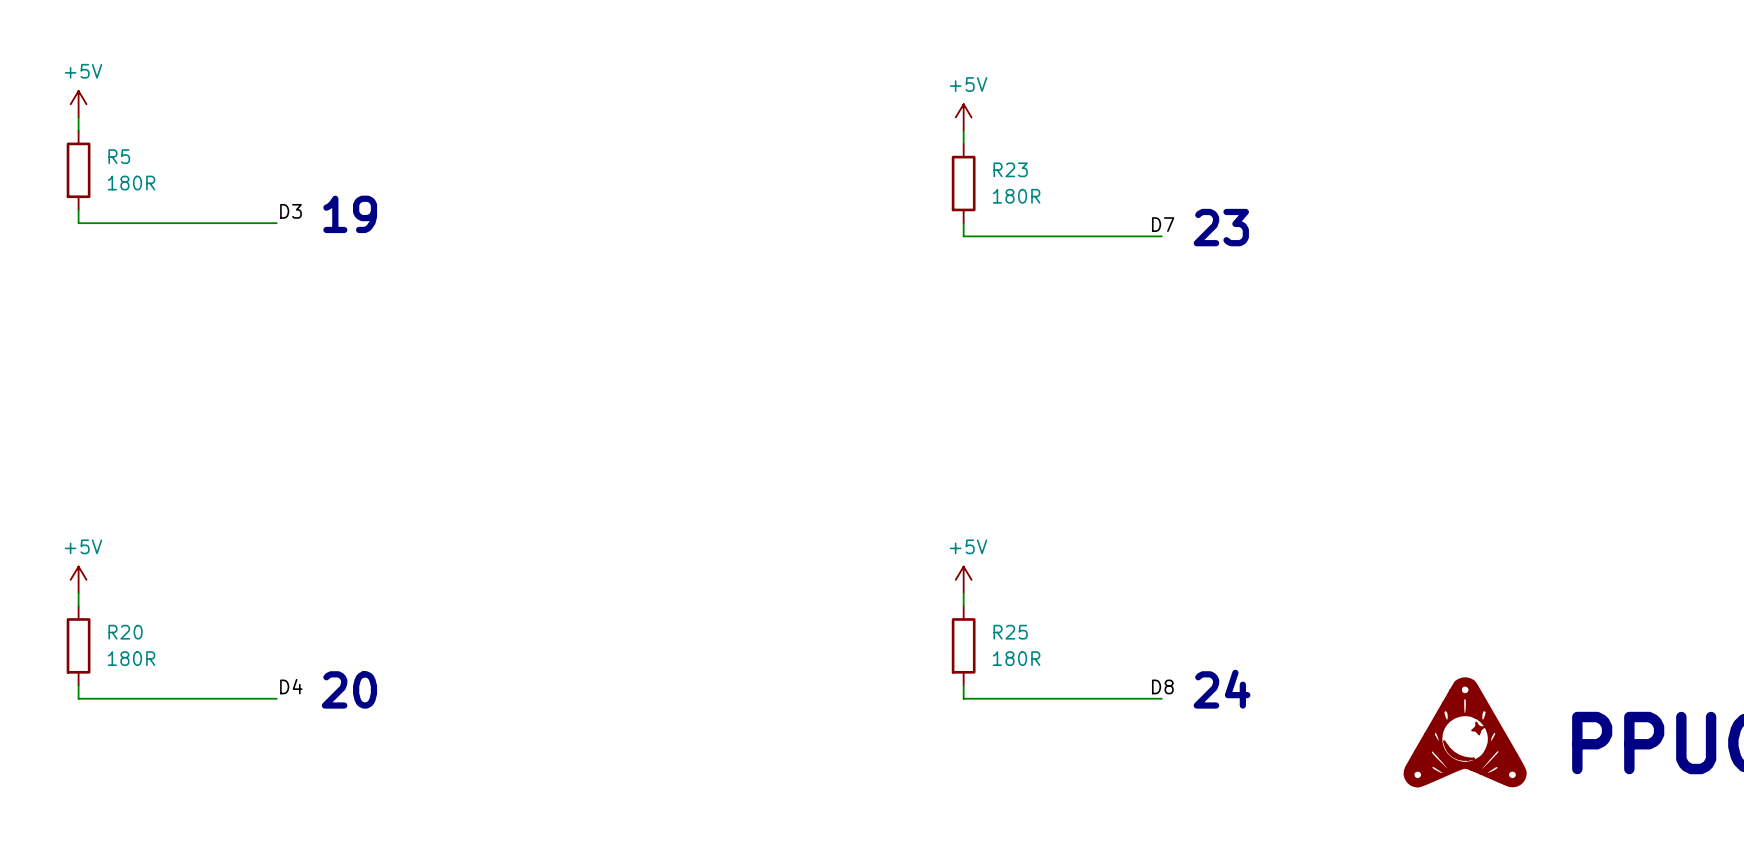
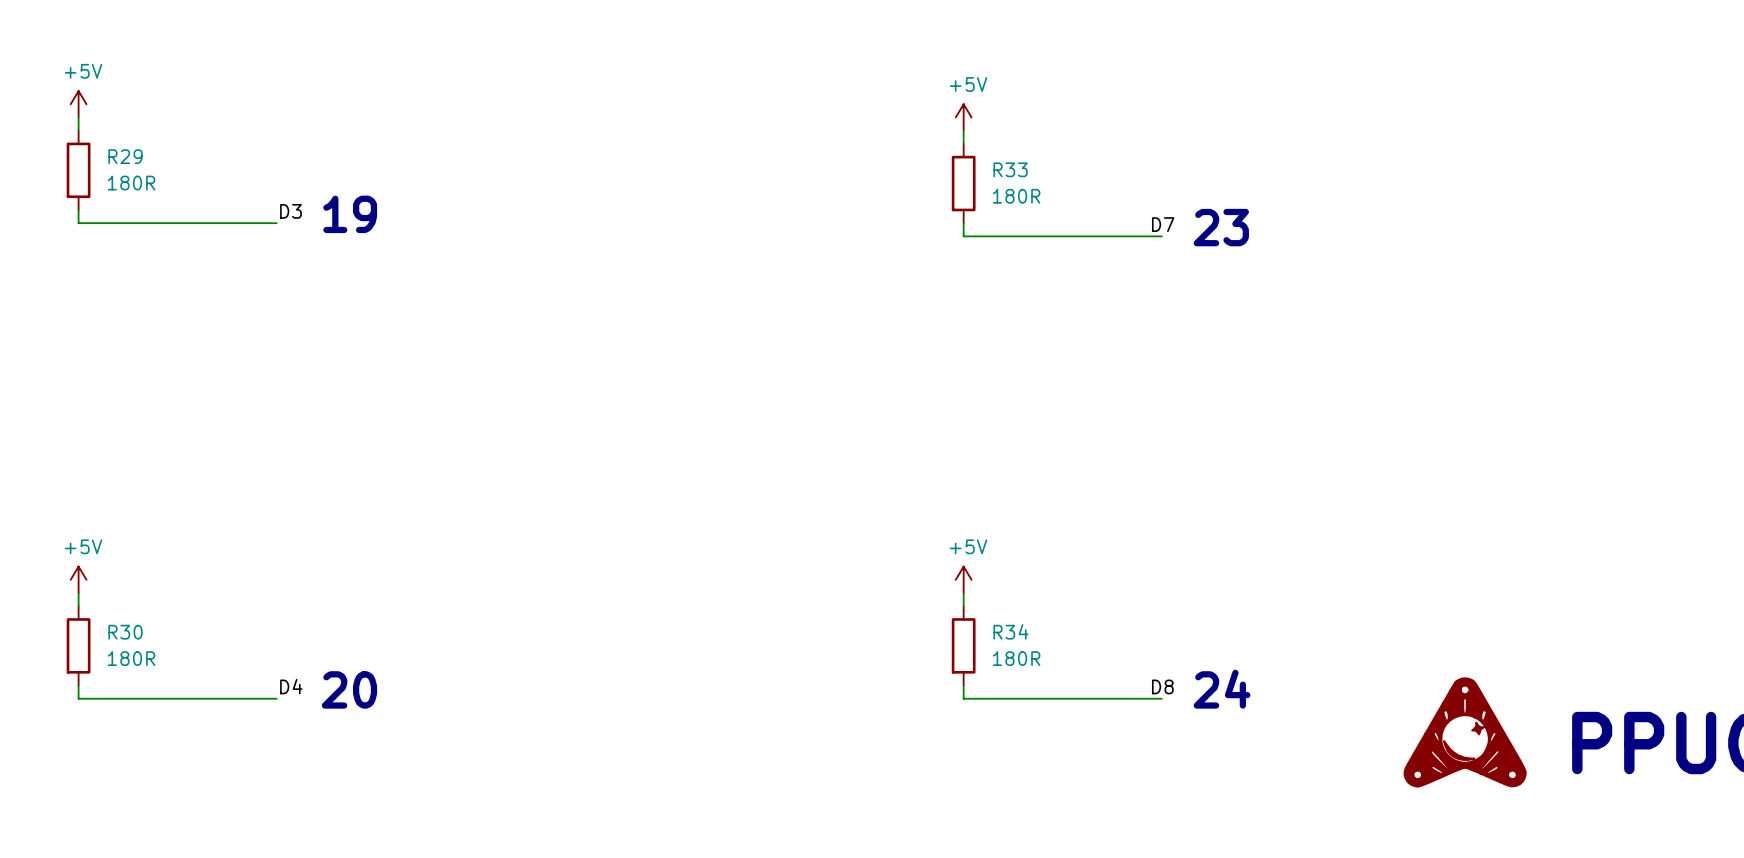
R5 name: R5 (119, 156) -> R29 (125, 156)
R23 name: R23 (1010, 169) -> R33 (1010, 169)
R20 name: R20 (125, 632) -> R30 (125, 632)
R25 name: R25 (1010, 632) -> R34 (1010, 631)

